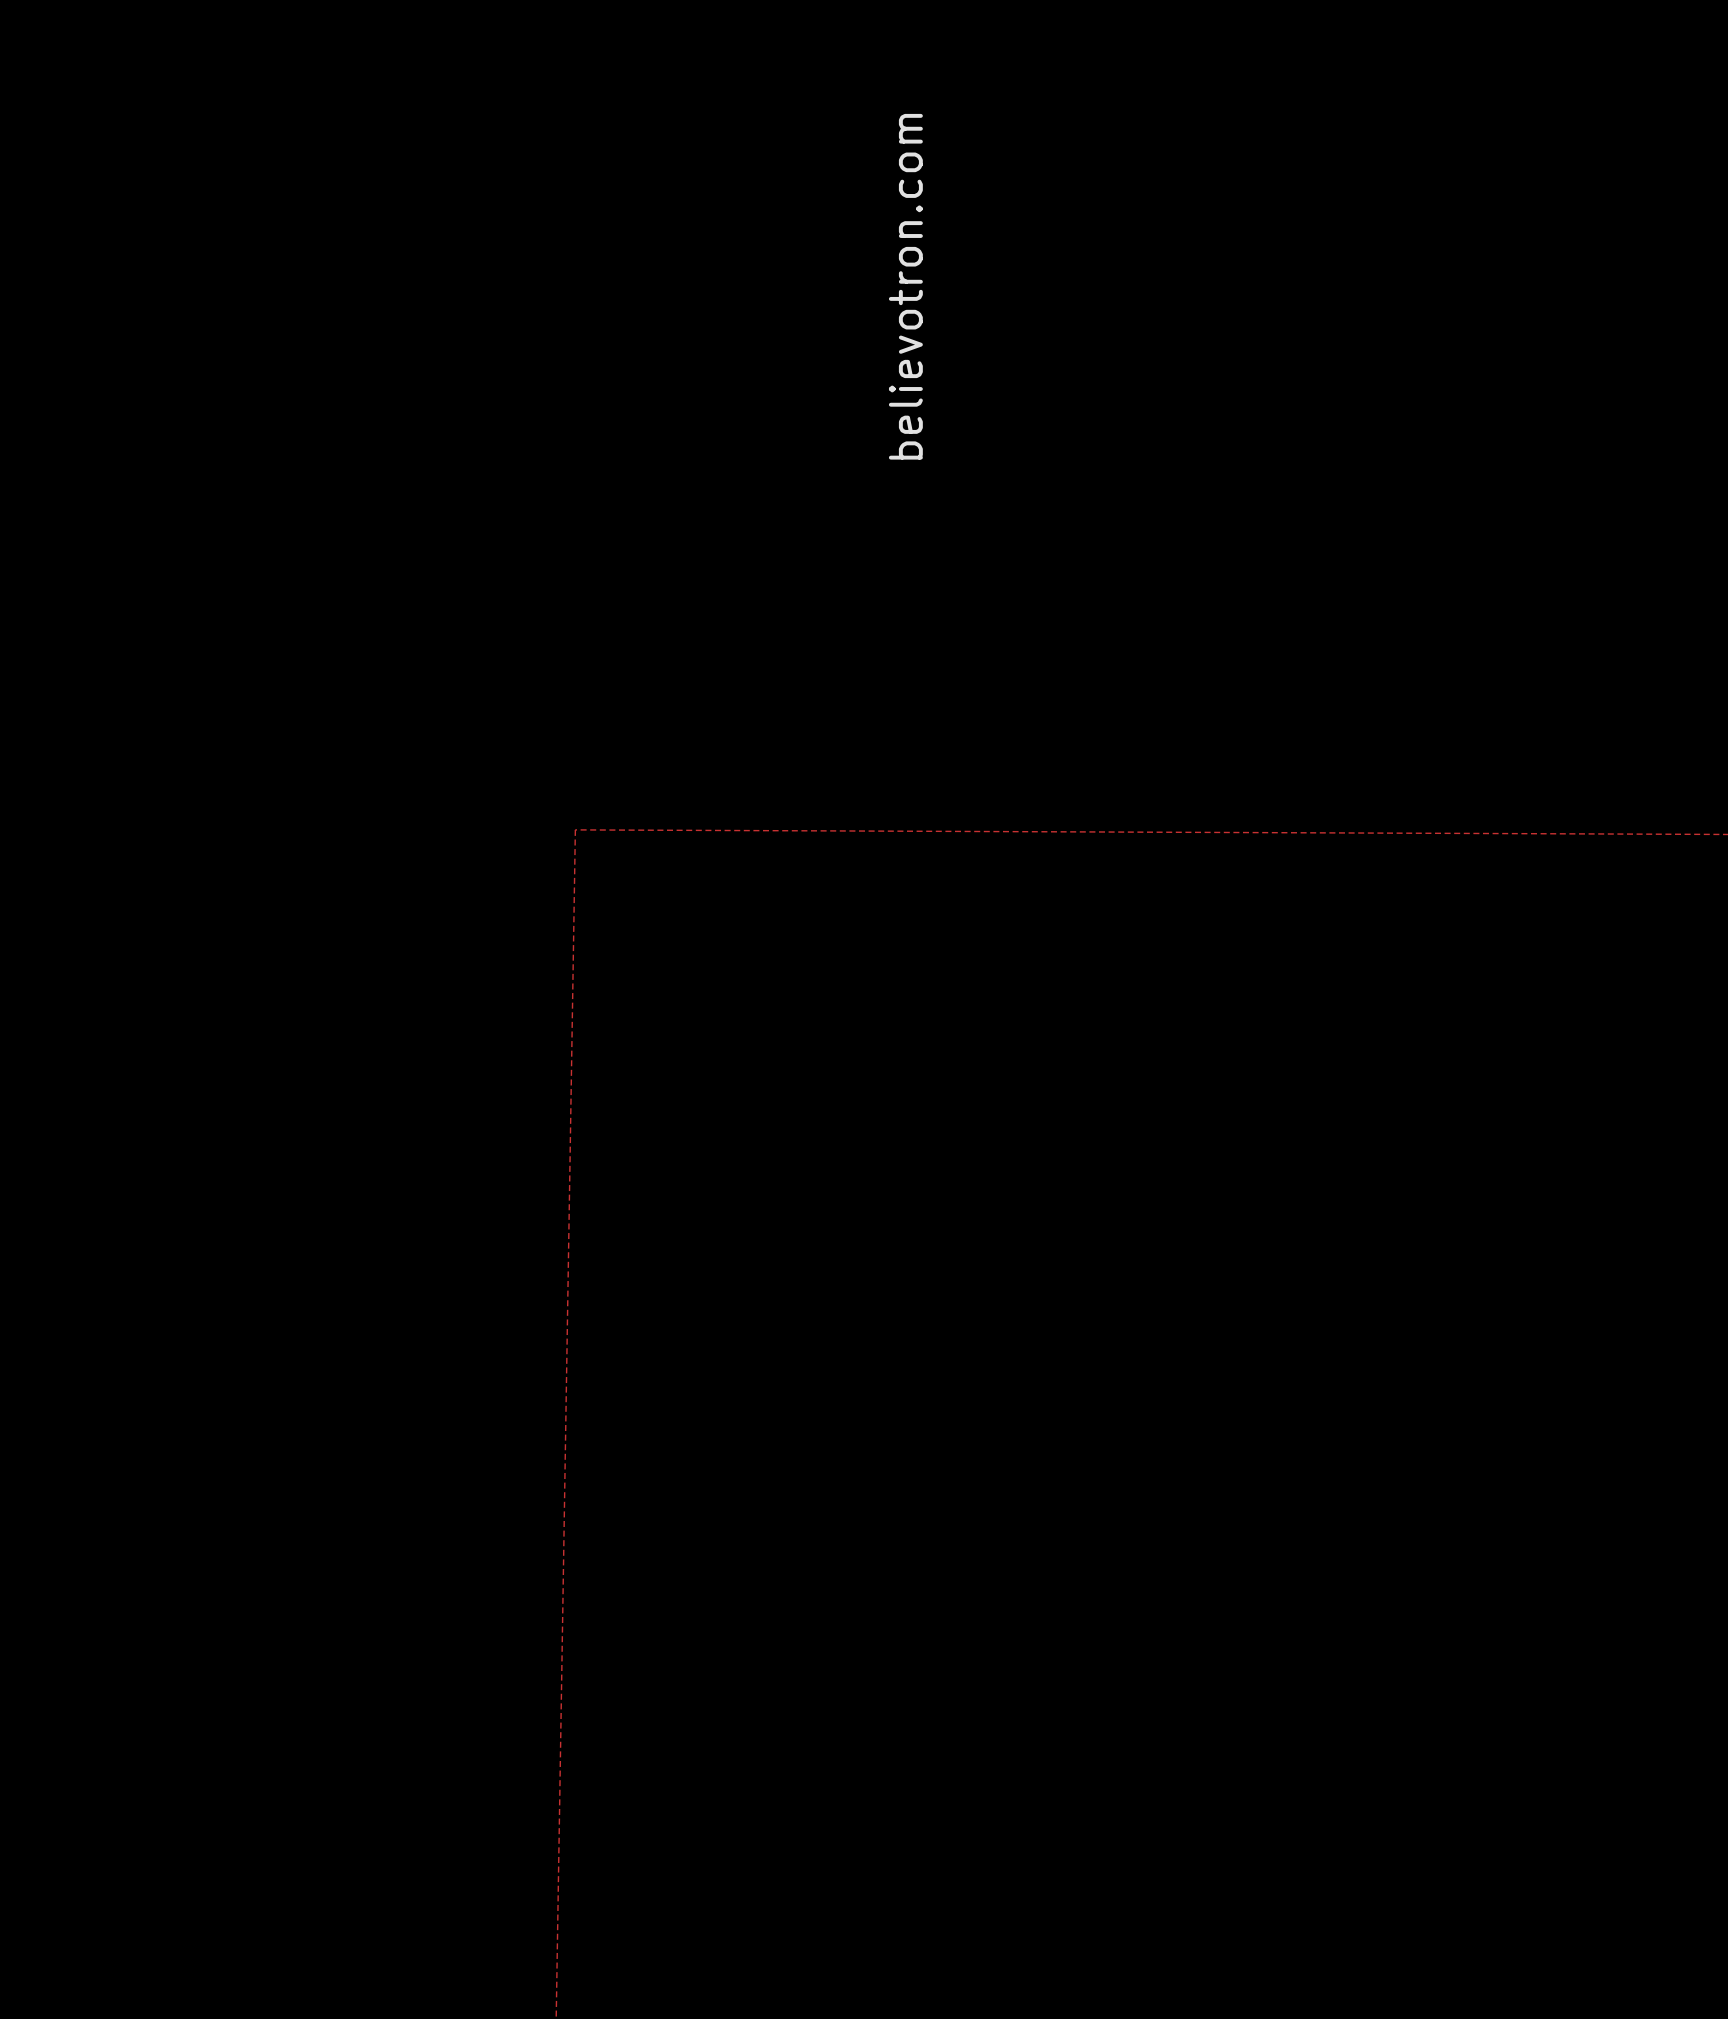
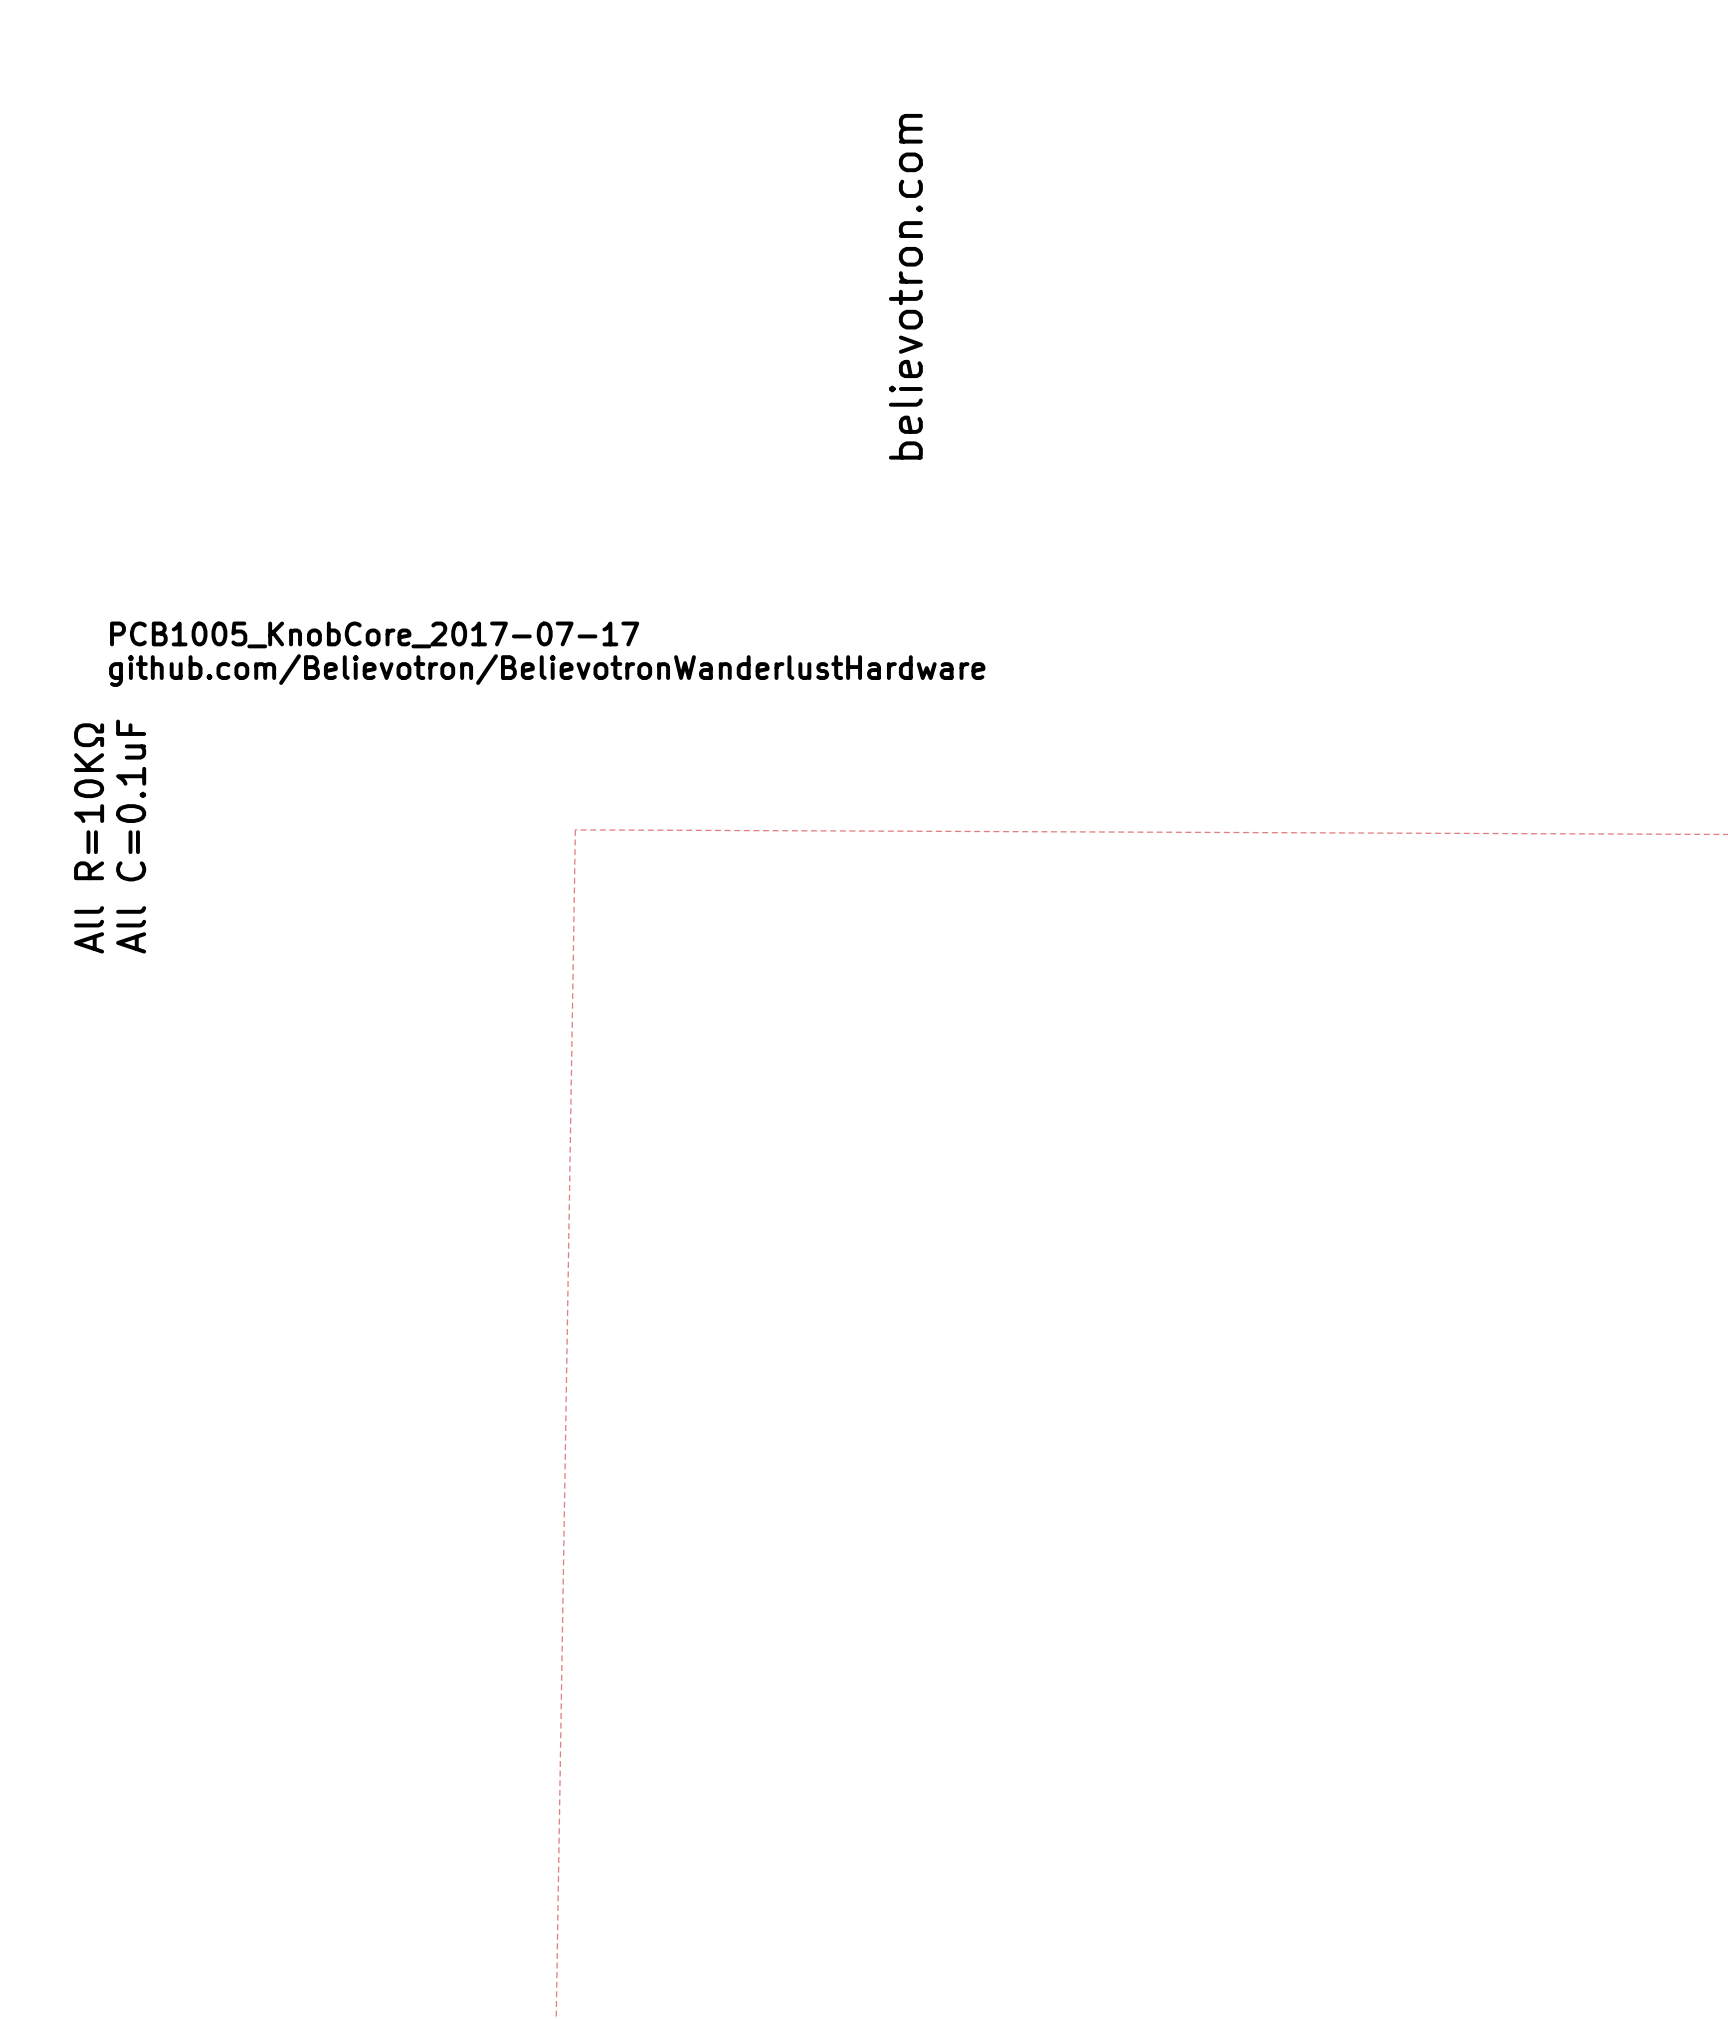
text: none -> PCB1005_KnobCore_2017-07-17 (374, 634)
text: none -> github.com/Believotron/BelievotronWanderlustHardware (547, 670)
text: none -> All C=0.1uF (131, 836)
text: none -> All R=10KΩ (89, 838)

